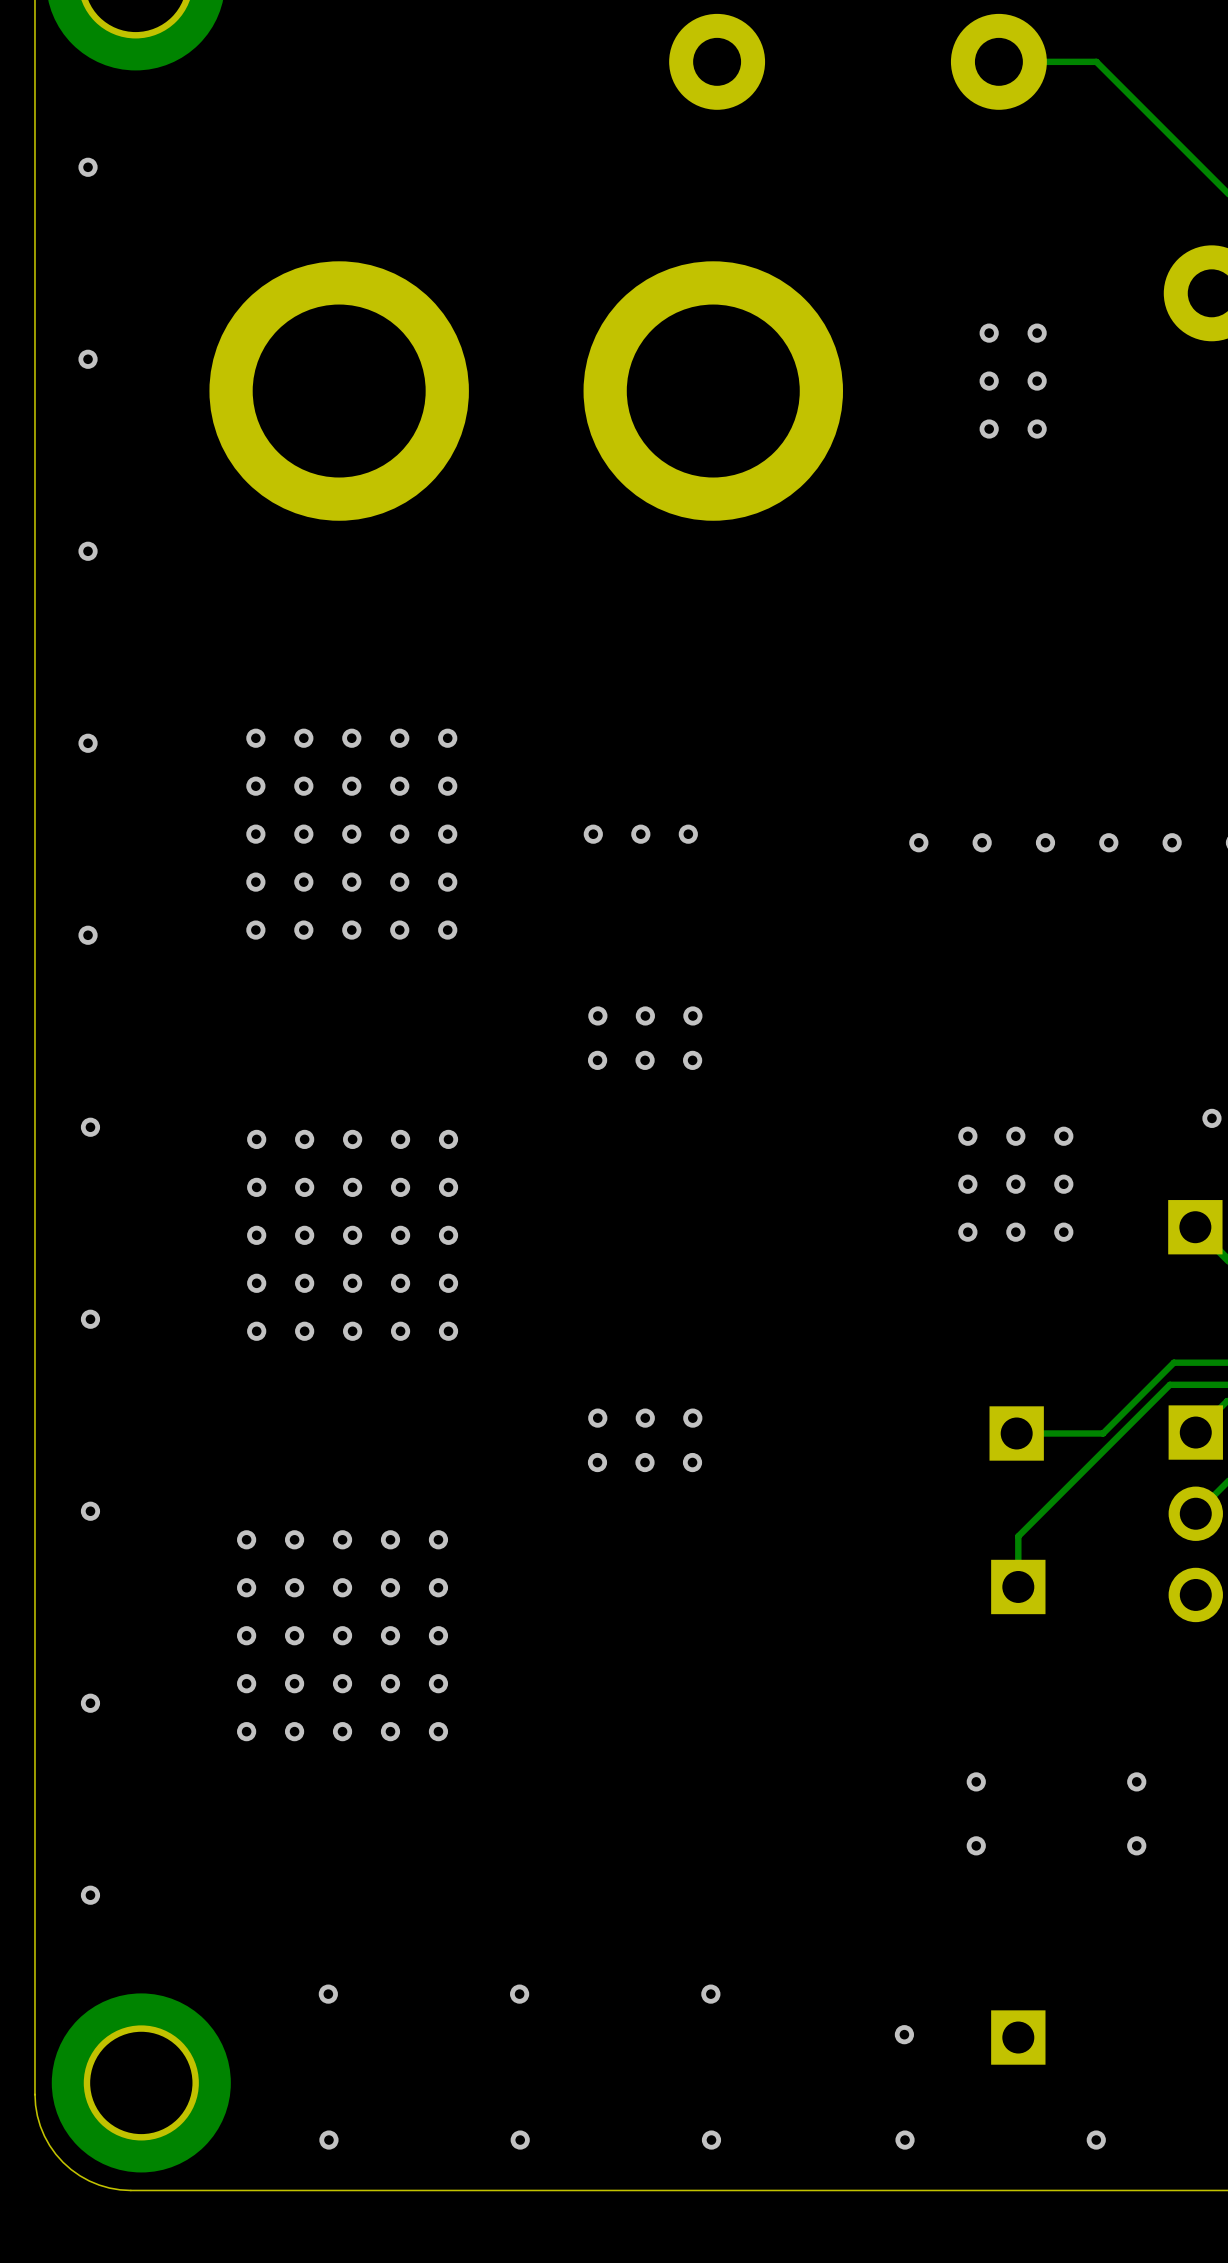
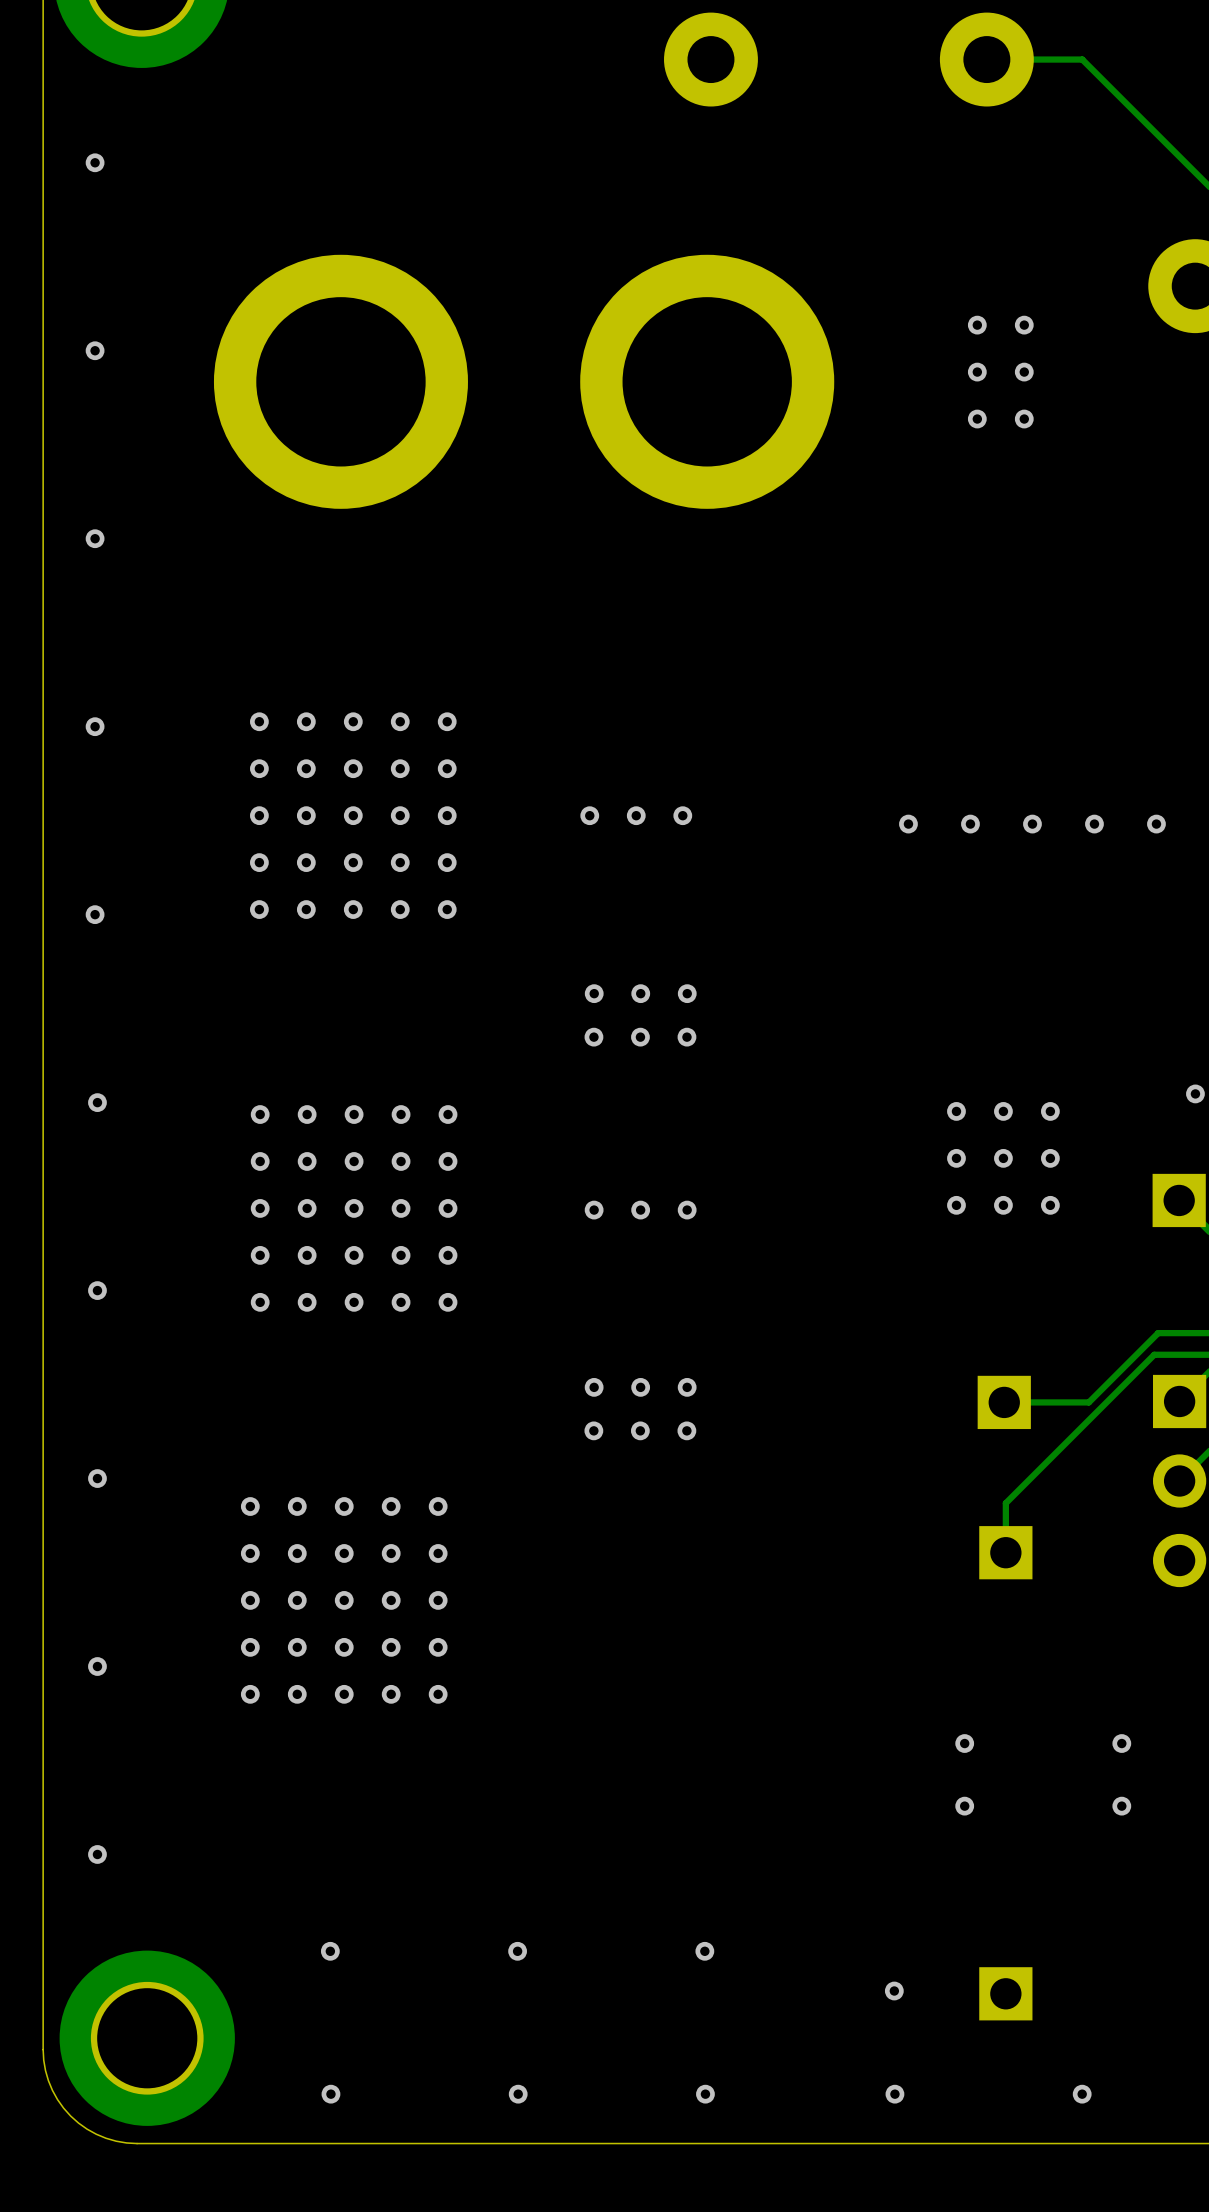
via: none -> (594, 1210)
via: none -> (640, 1210)
via: none -> (687, 1210)

